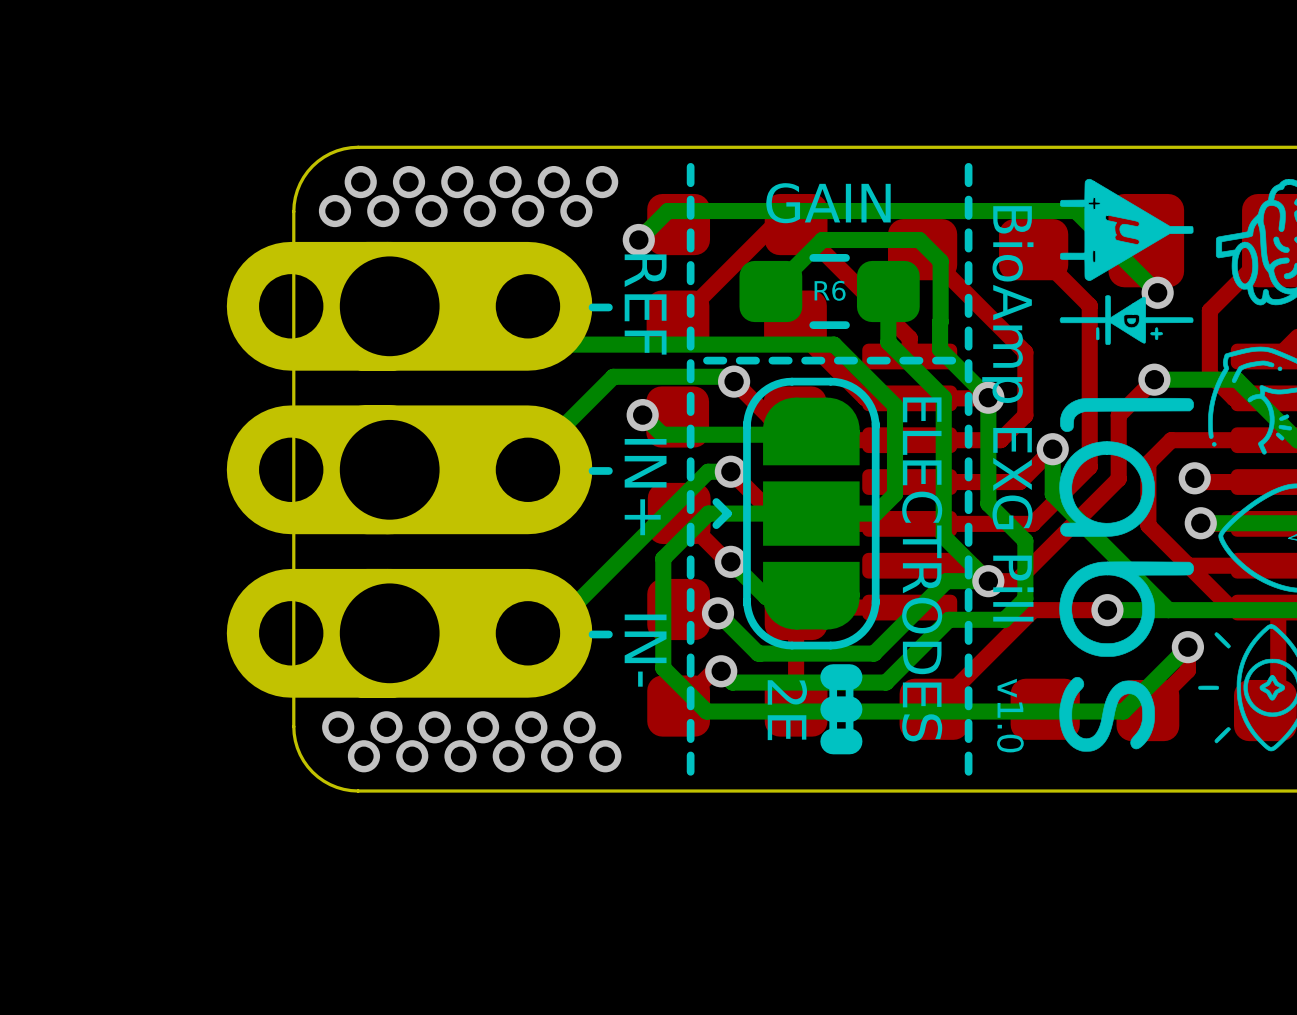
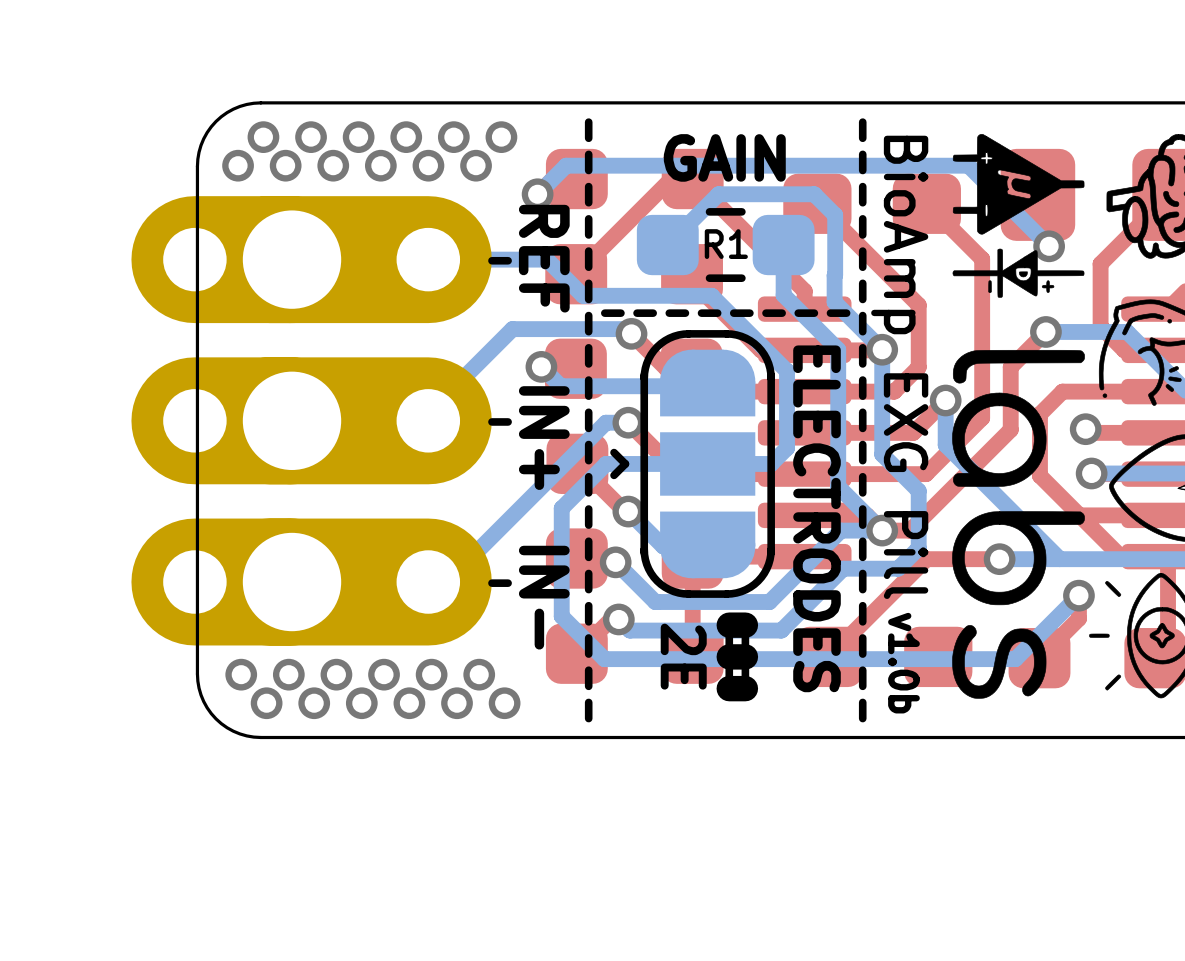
R6 name: R6 (830, 290) -> R1 (726, 244)
bottom track: (527, 306) (566, 344) (834, 344) (895, 405) (895, 494) (891, 497) -> (428, 259) (546, 259) (583, 295) (711, 295) (787, 371) (787, 448)
text: v1.0 (1010, 715) -> v1.0b (903, 663)

